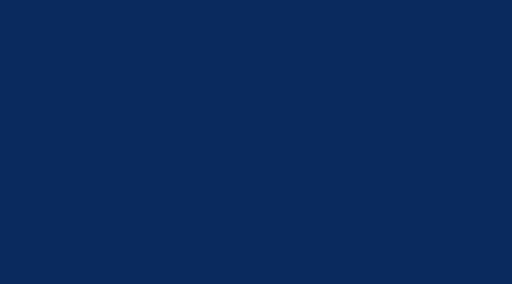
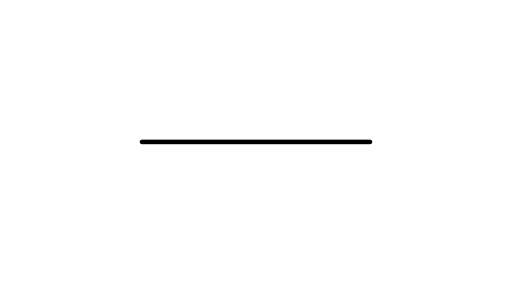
part: none -> (255, 141)

